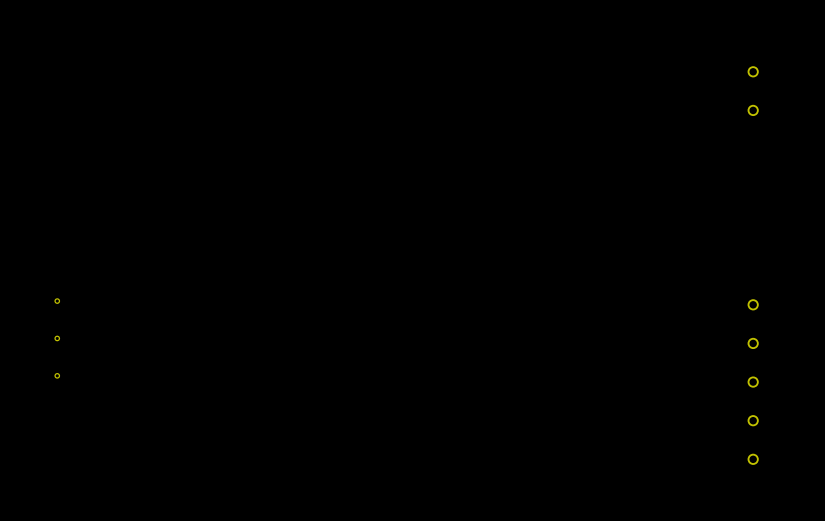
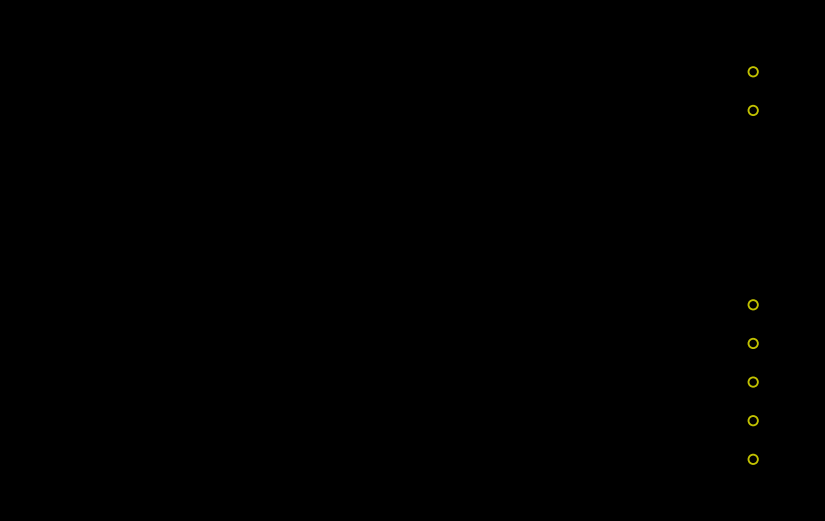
part: (57, 301) -> none
part: (57, 338) -> none
part: (57, 375) -> none

